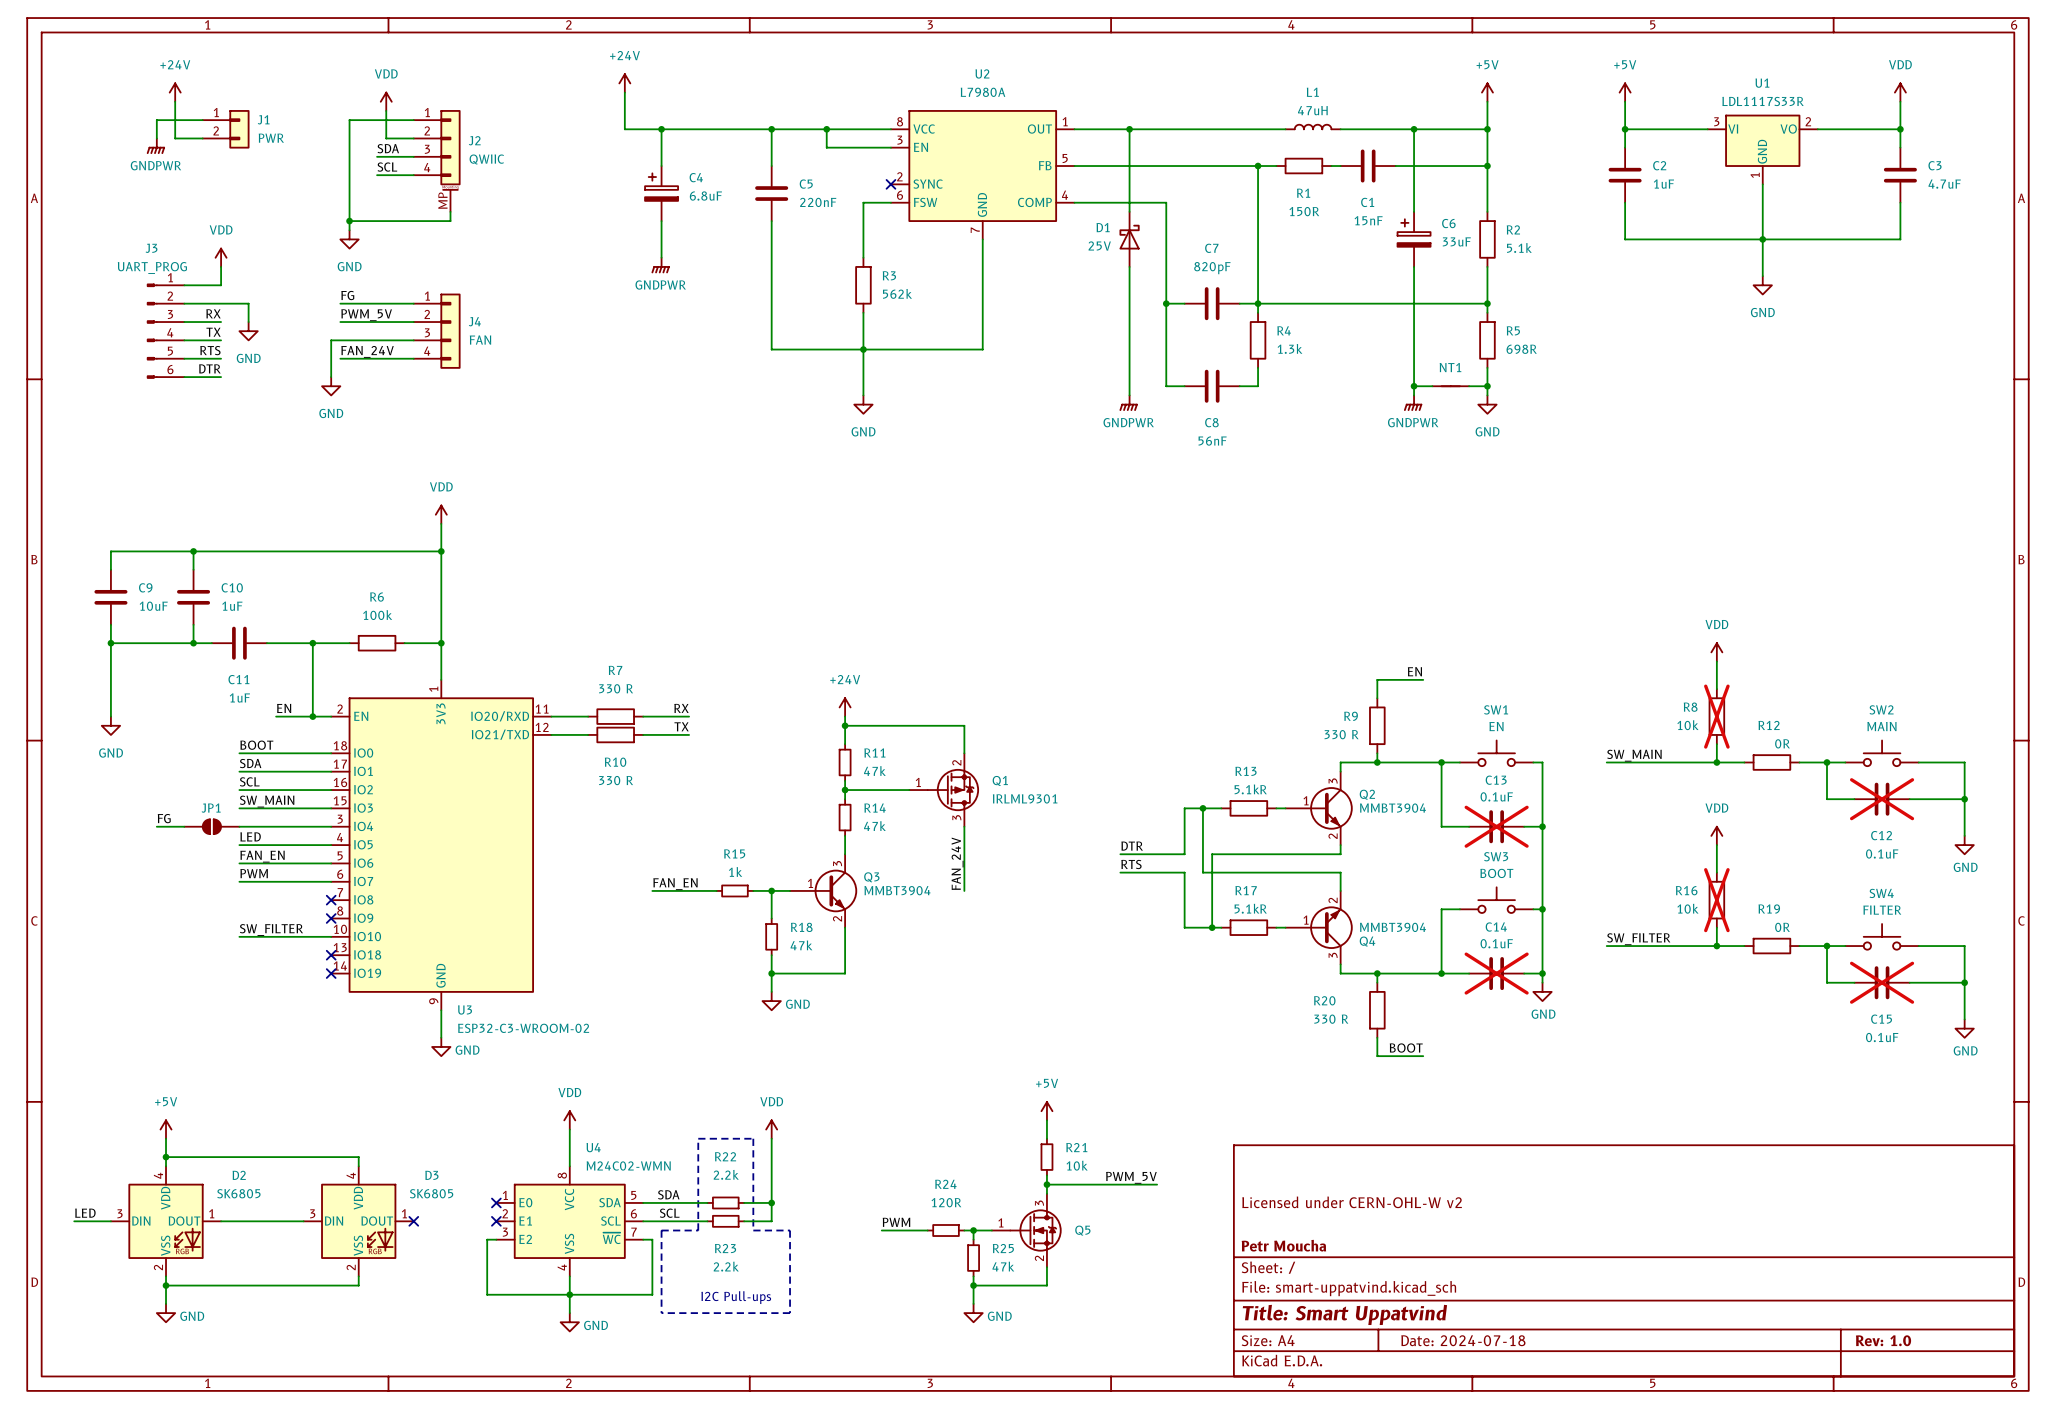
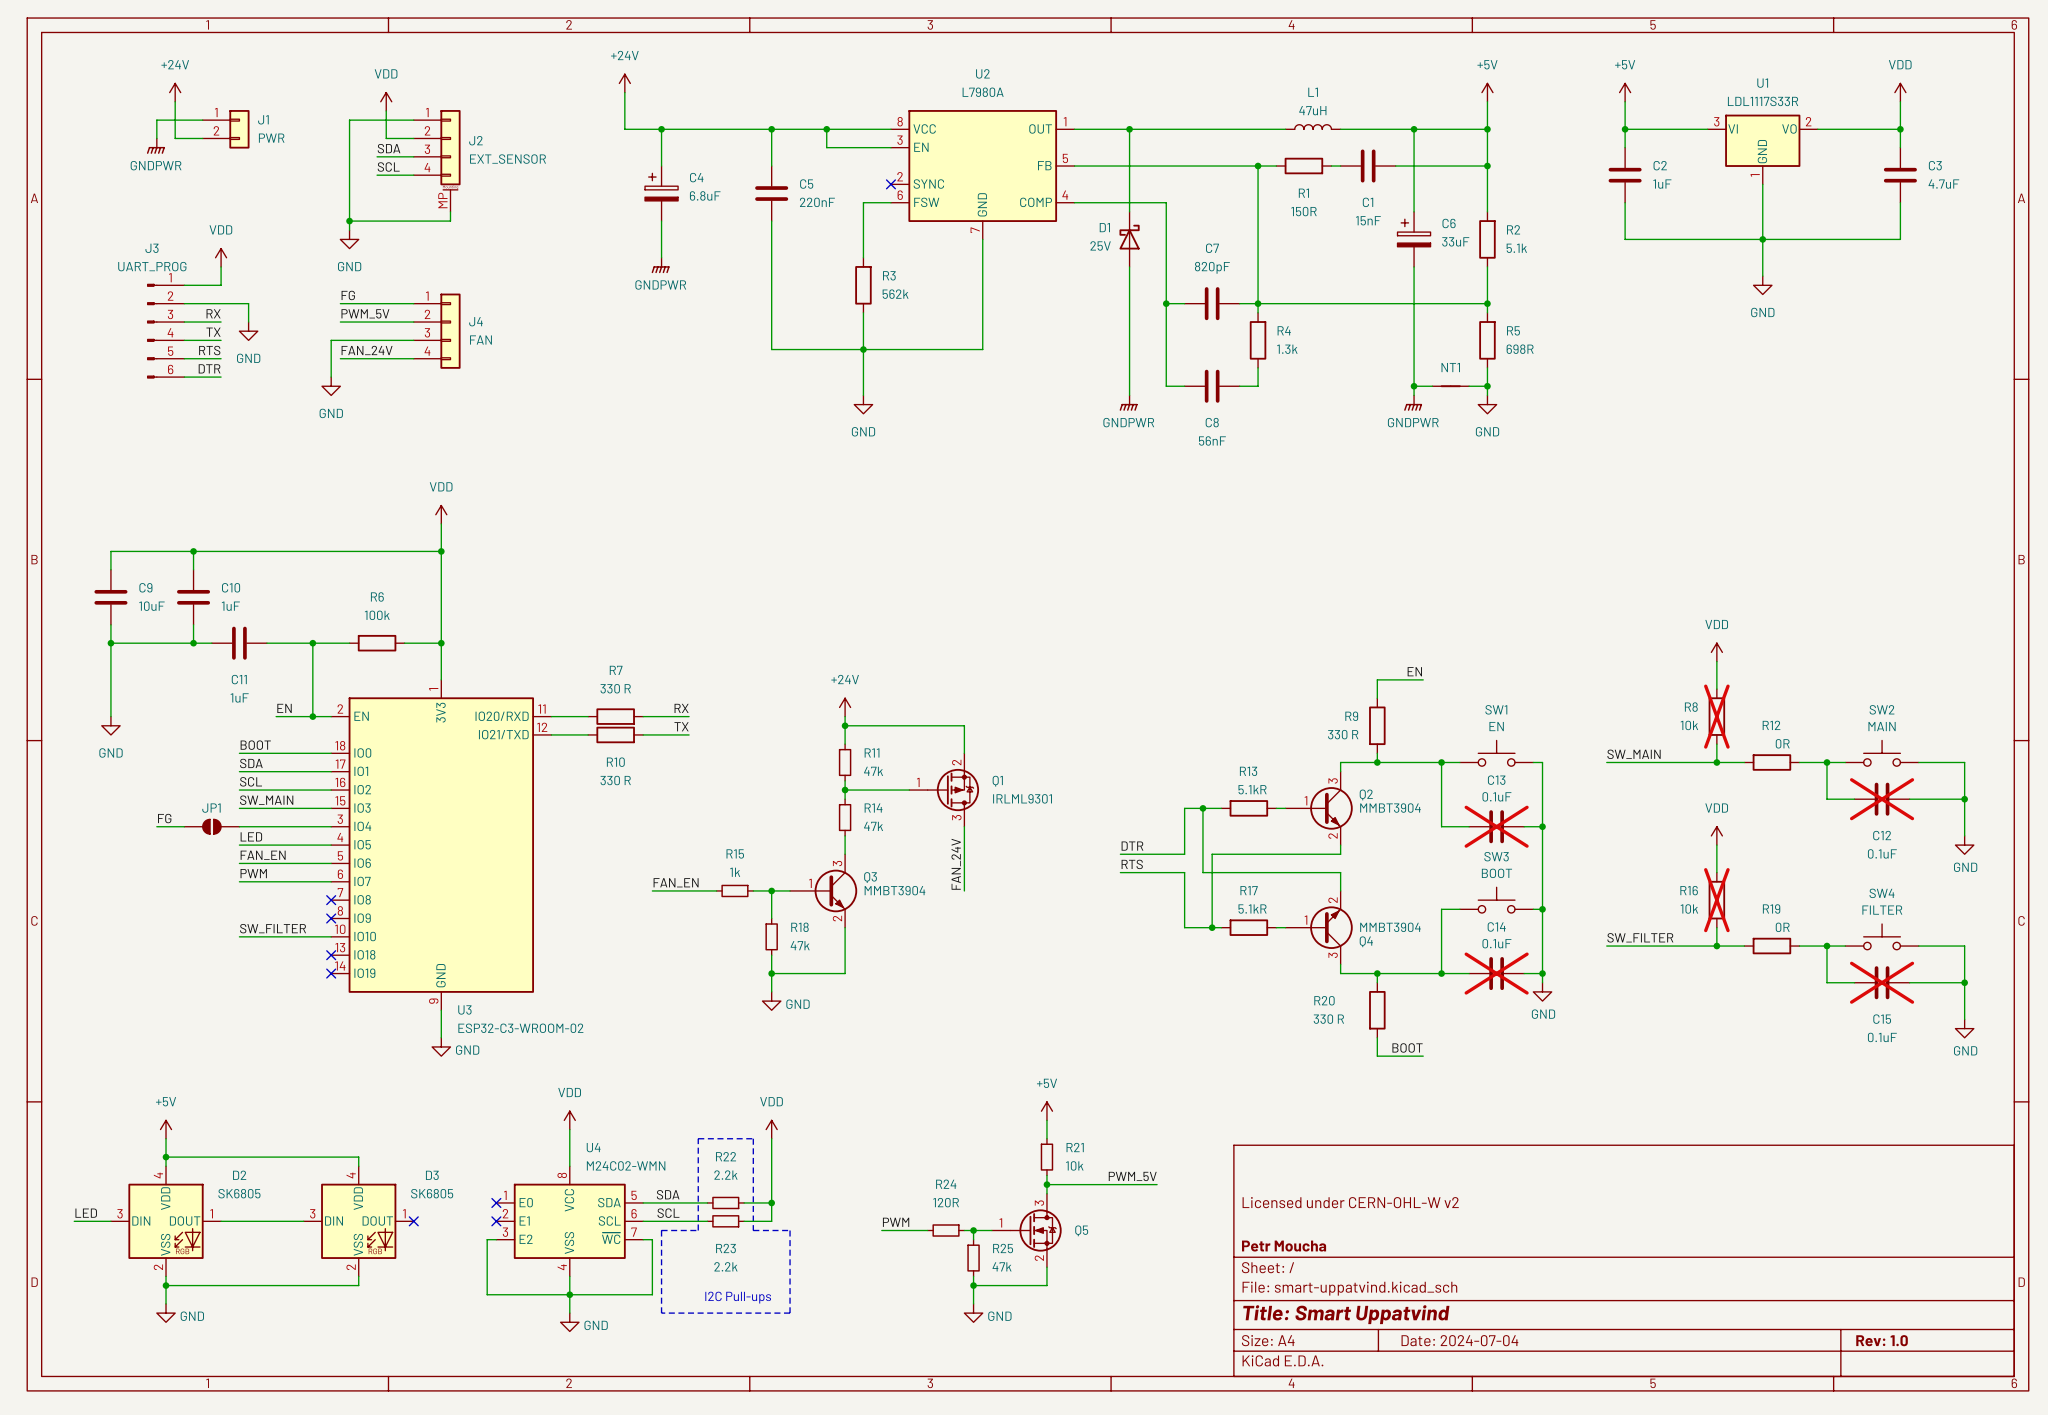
J2 value: QWIIC (486, 159) -> EXT_SENSOR (508, 159)
title block: Date: 2024-07-18 (1463, 1340) -> Date: 2024-07-04 (1459, 1340)

